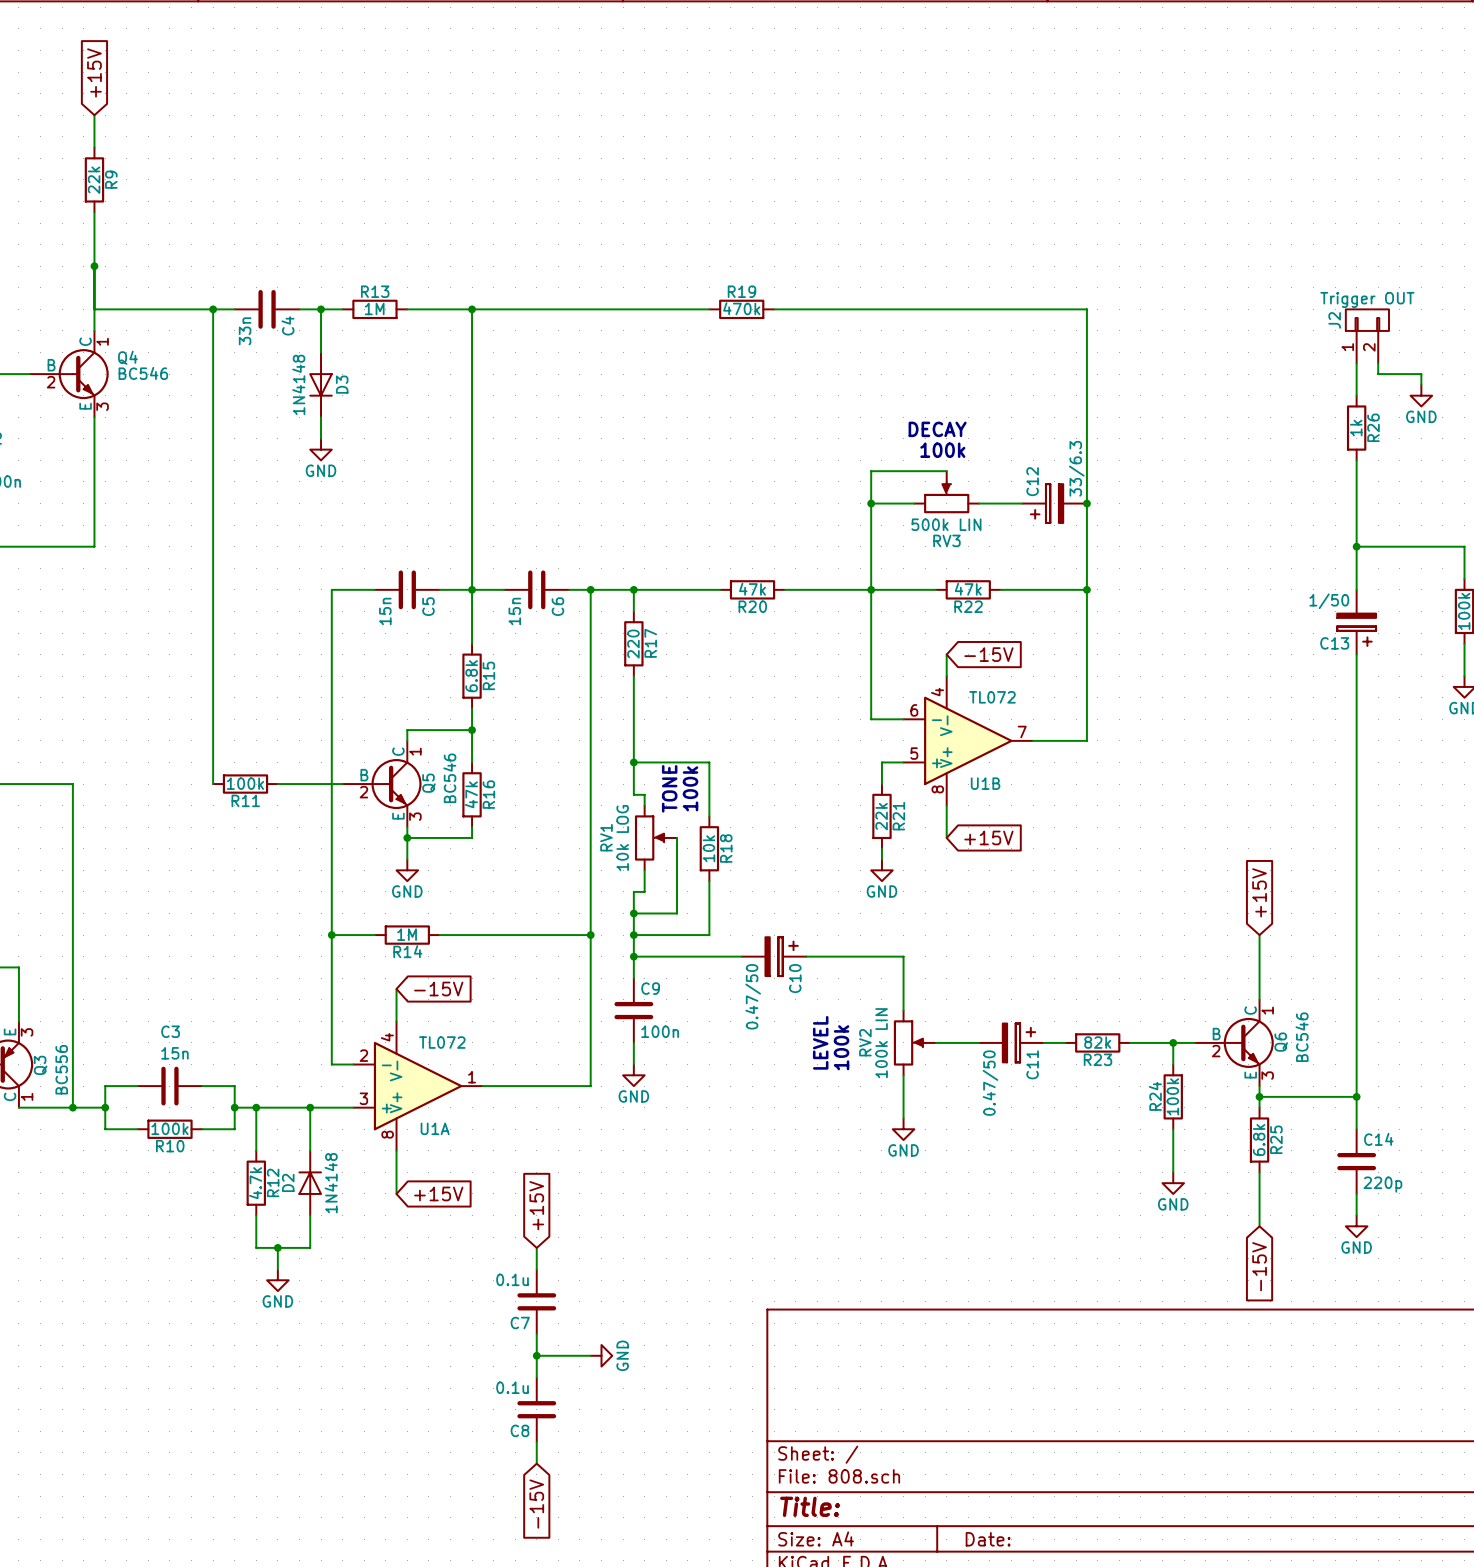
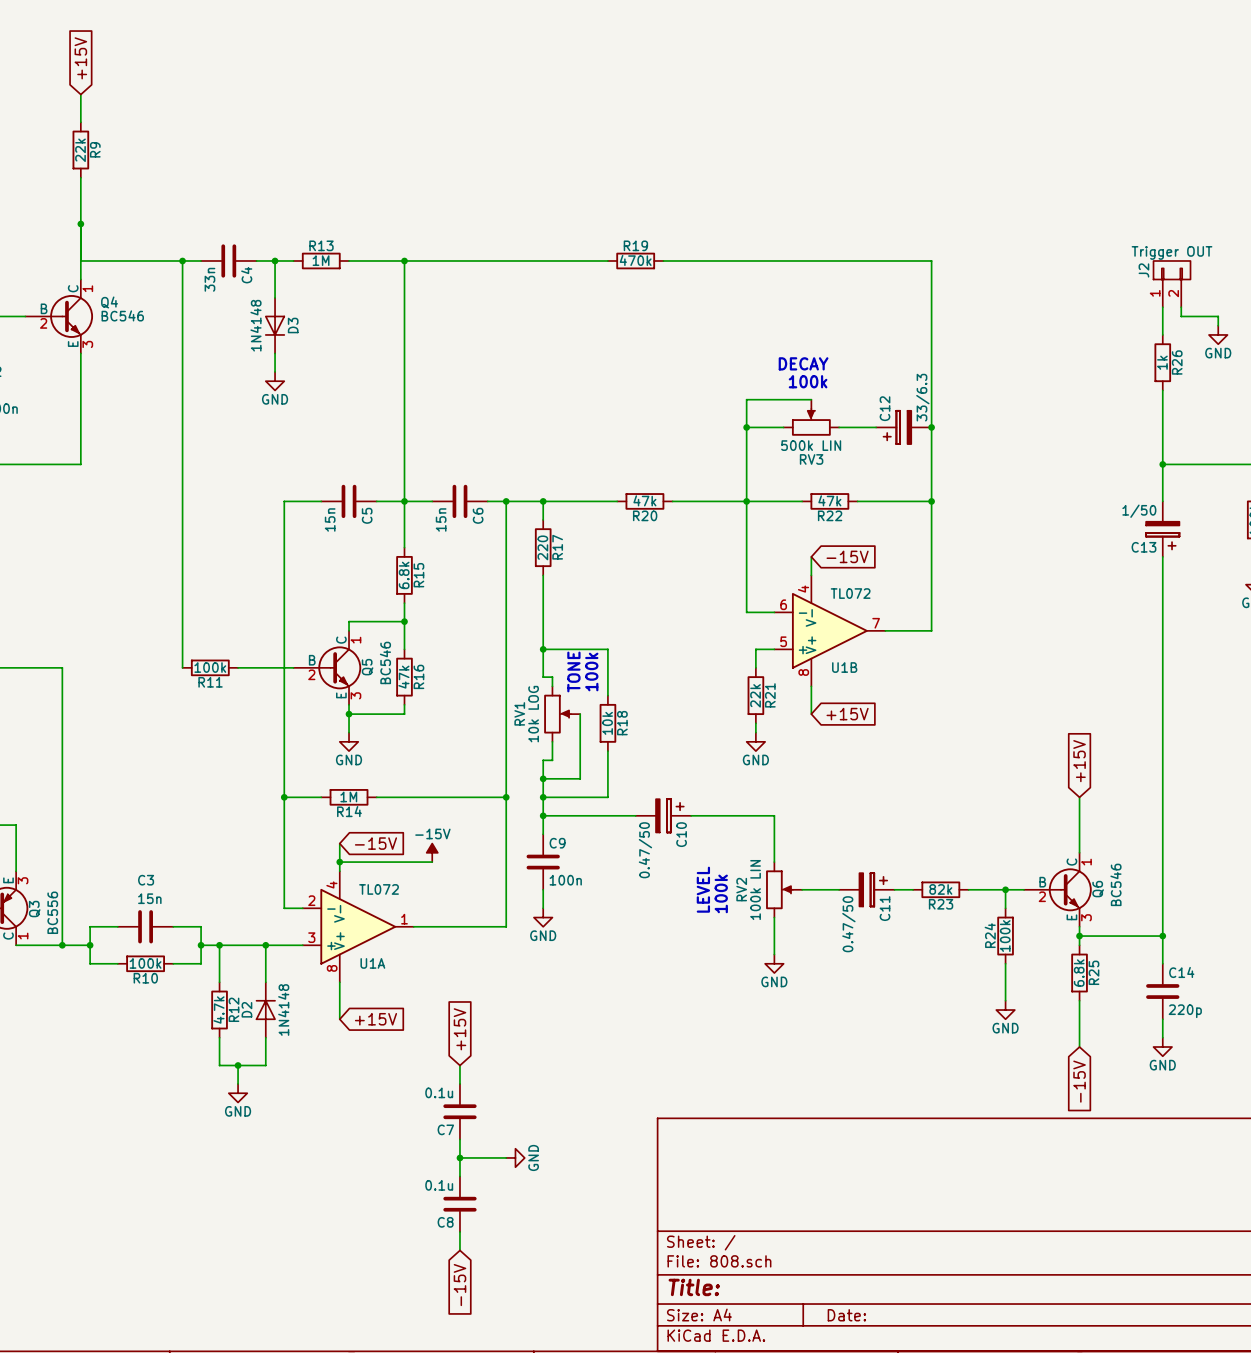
power symbol: none -> -15V (432, 852)
wire: none -> (339, 862) (432, 862)
junction: none -> (339, 862)

